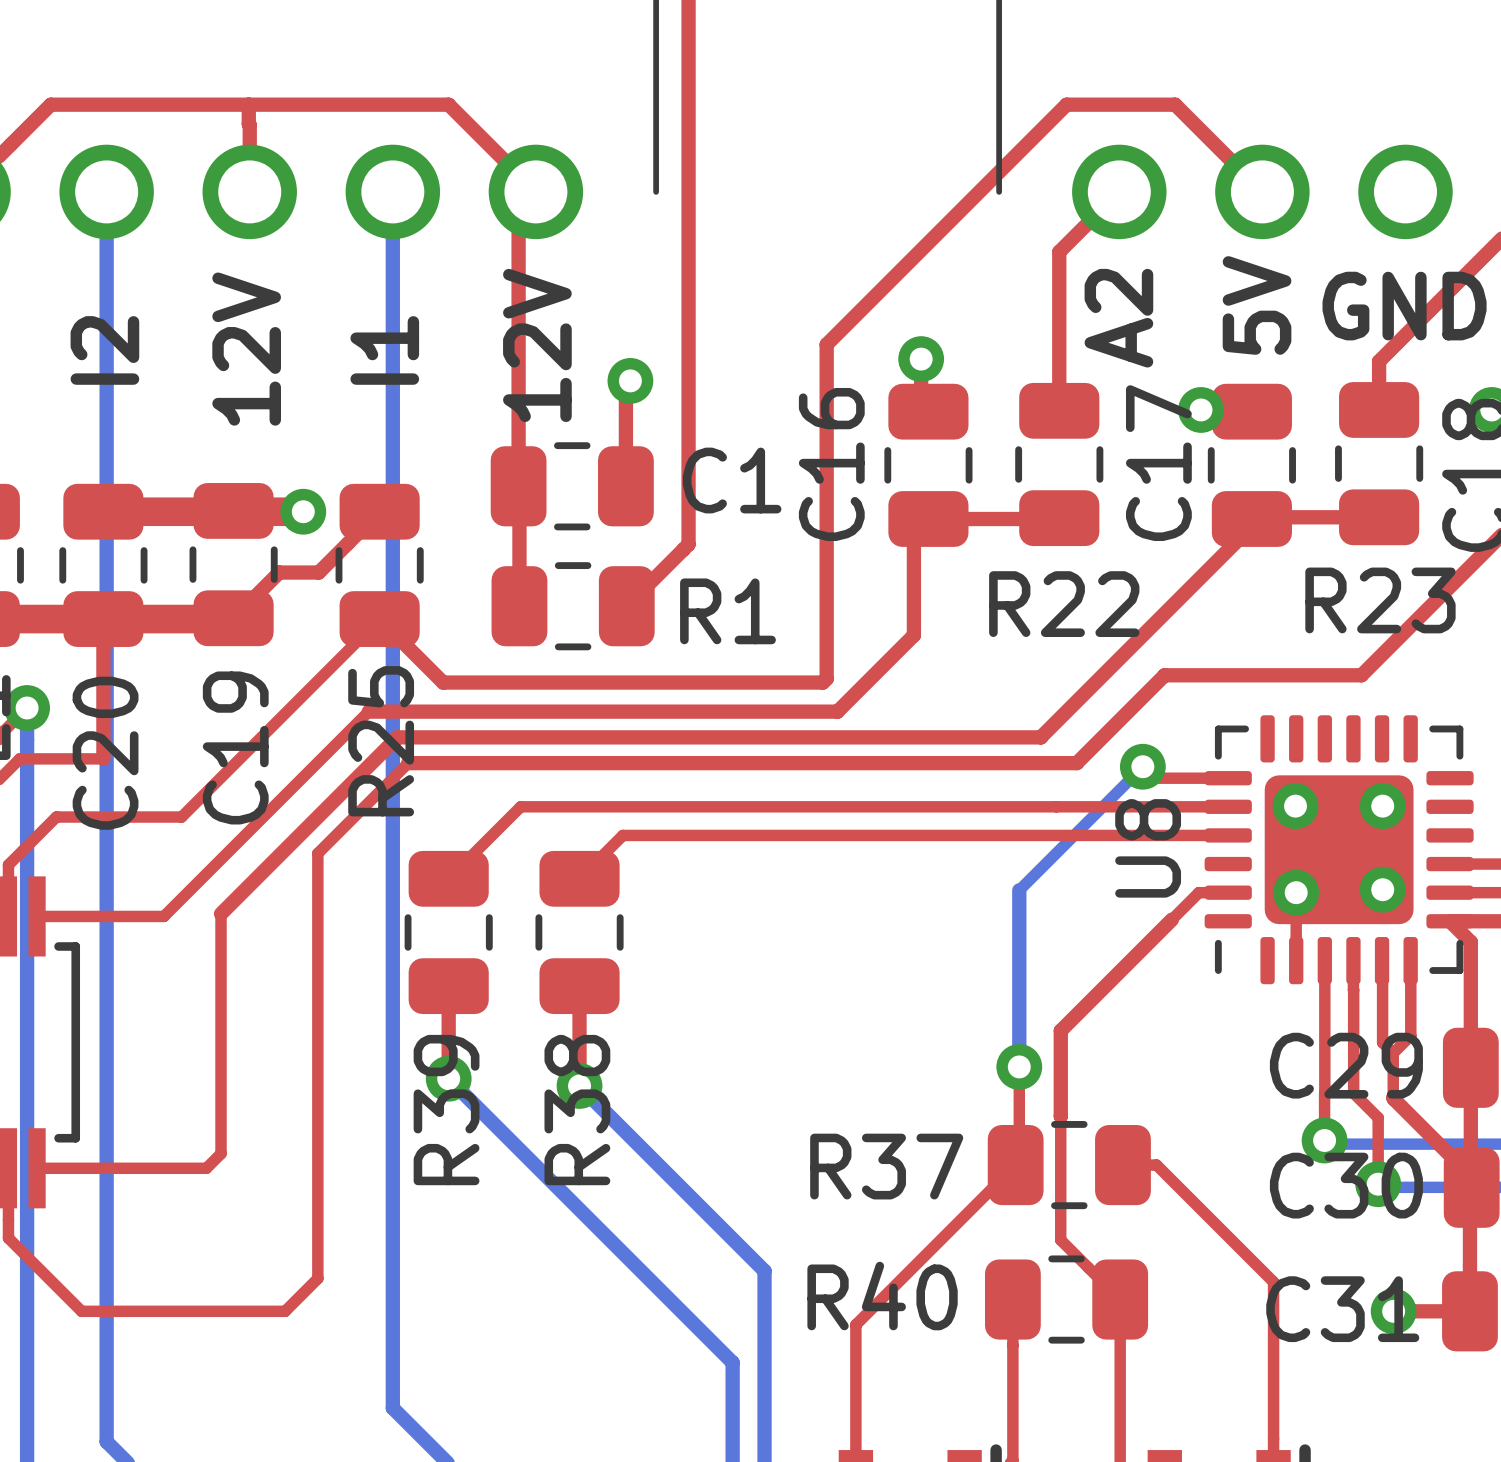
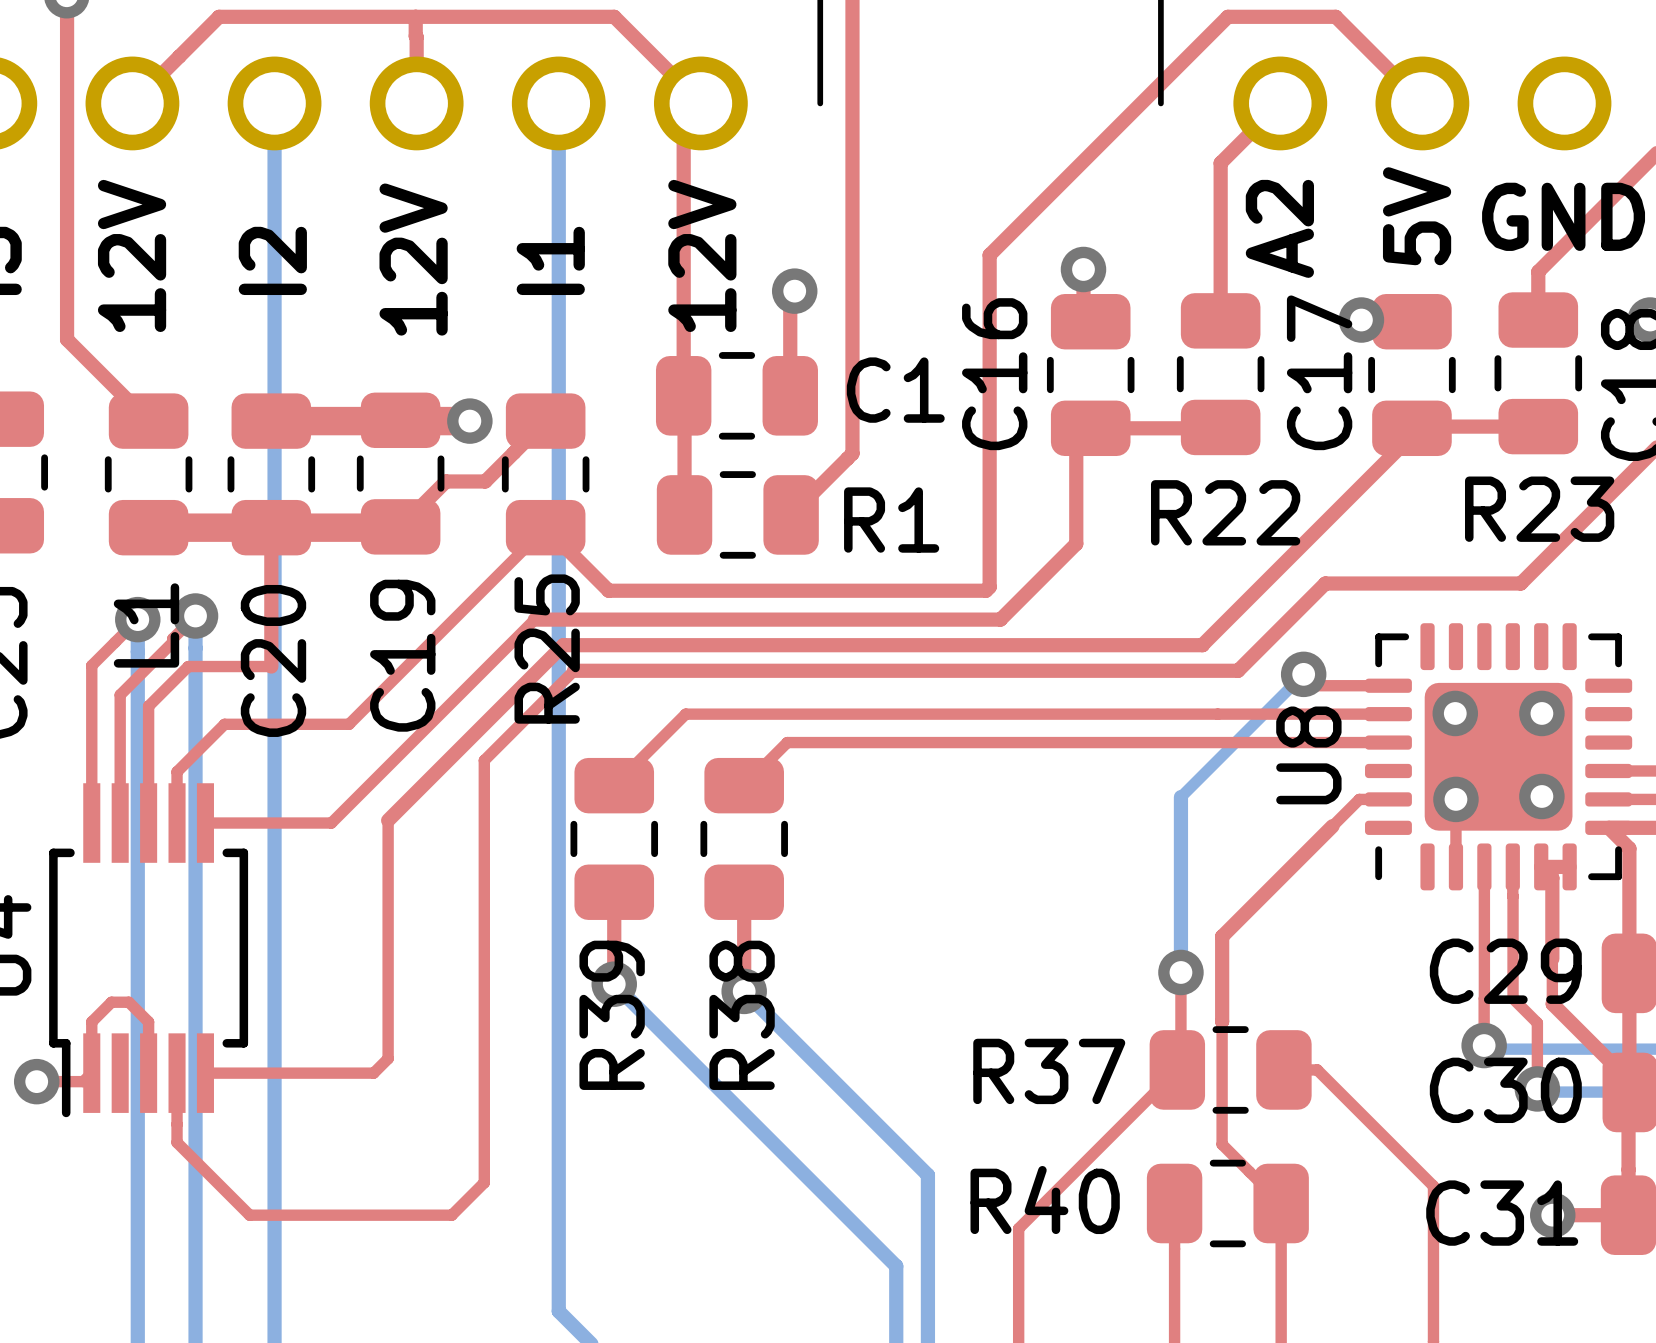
top track: (1410, 960) (1410, 1035) (1393, 1053) (1382, 1042) (1382, 961) -> (1569, 866) (1541, 866) (1552, 878) (1552, 958)

